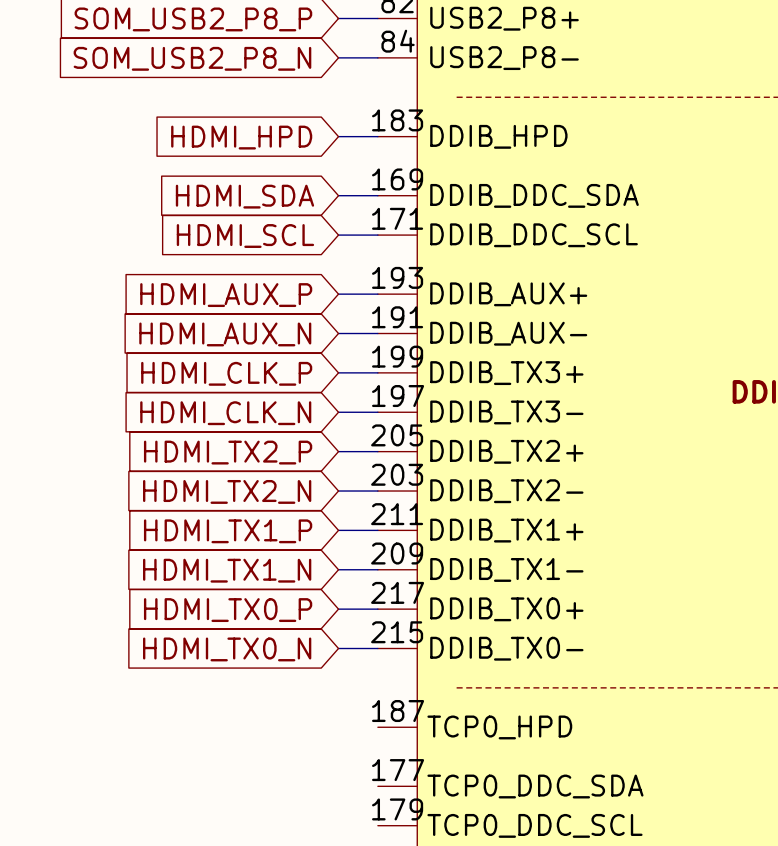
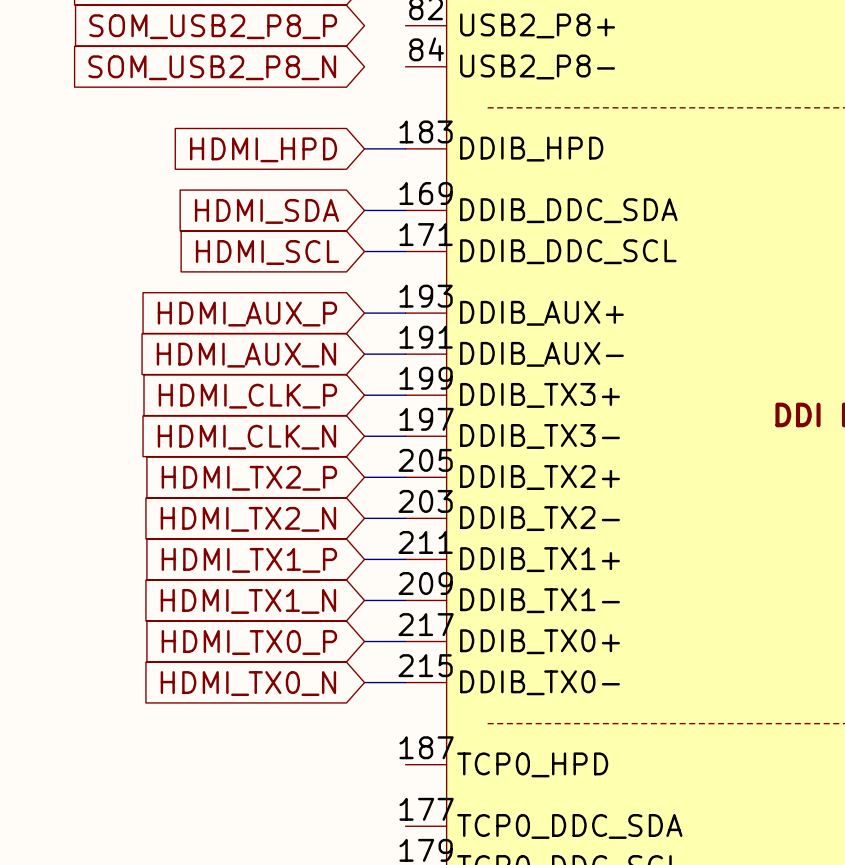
wire: (338, 18) (377, 18) -> none
wire: (338, 57) (377, 57) -> none

